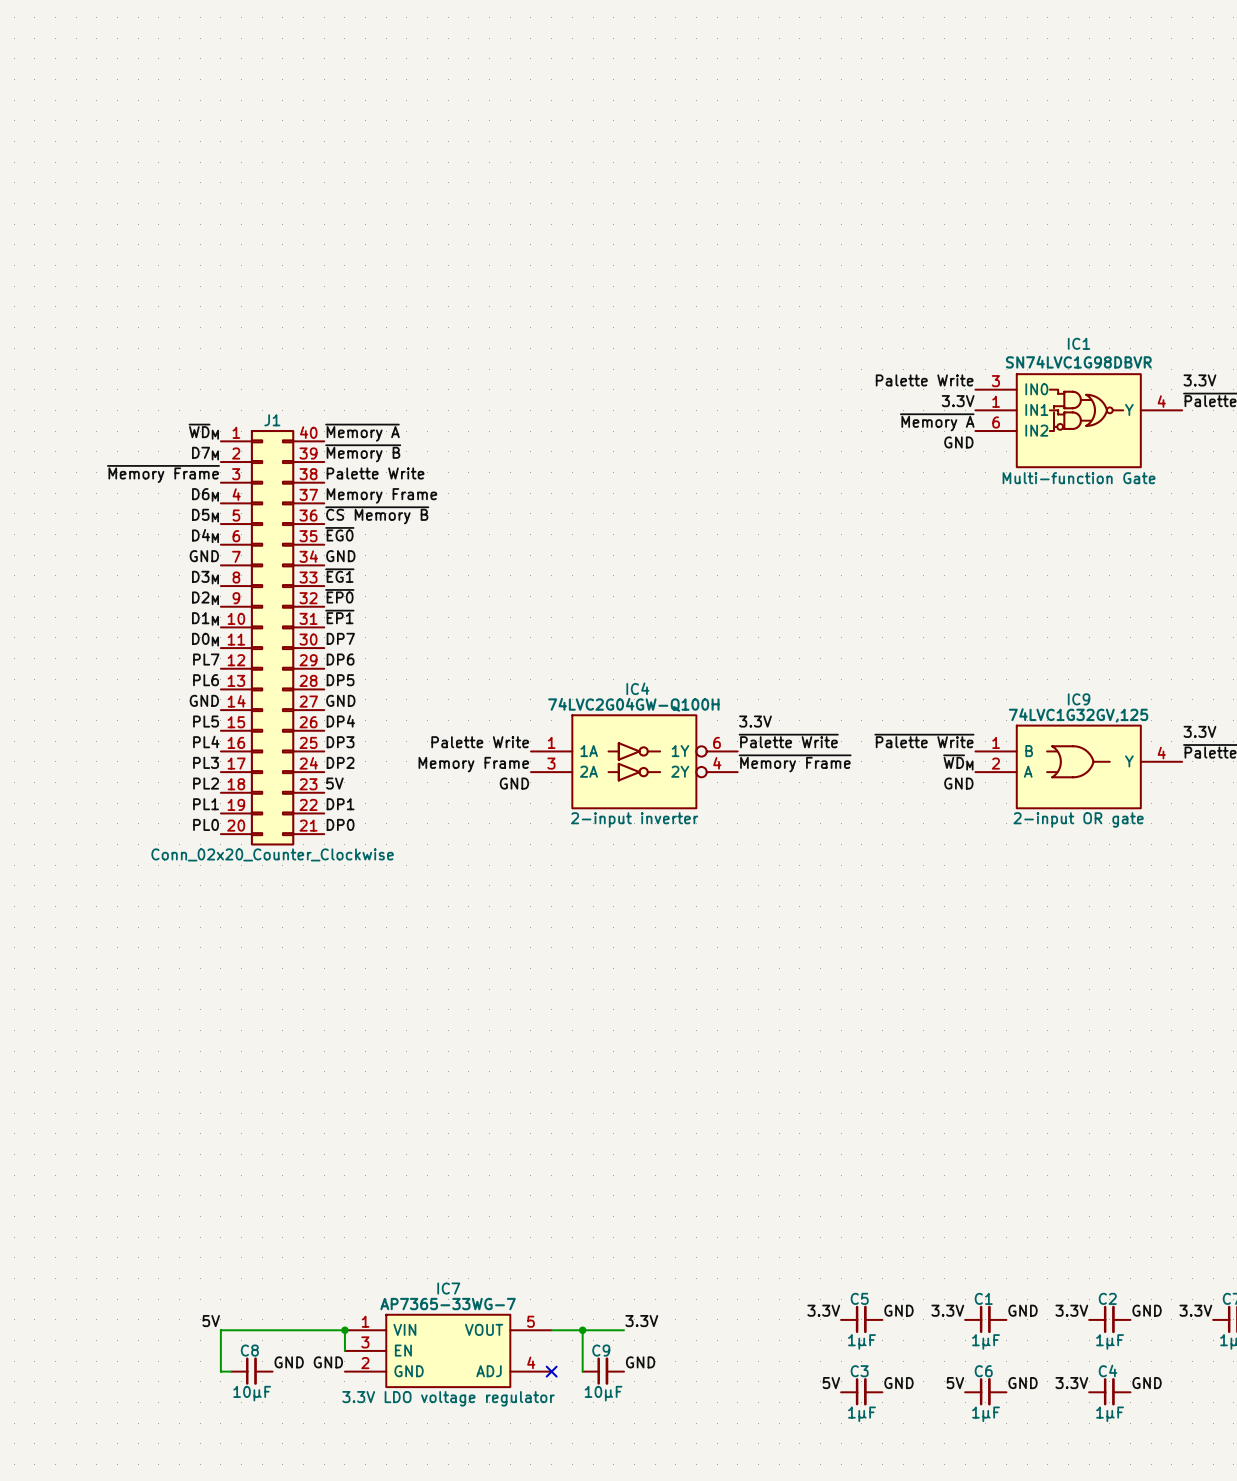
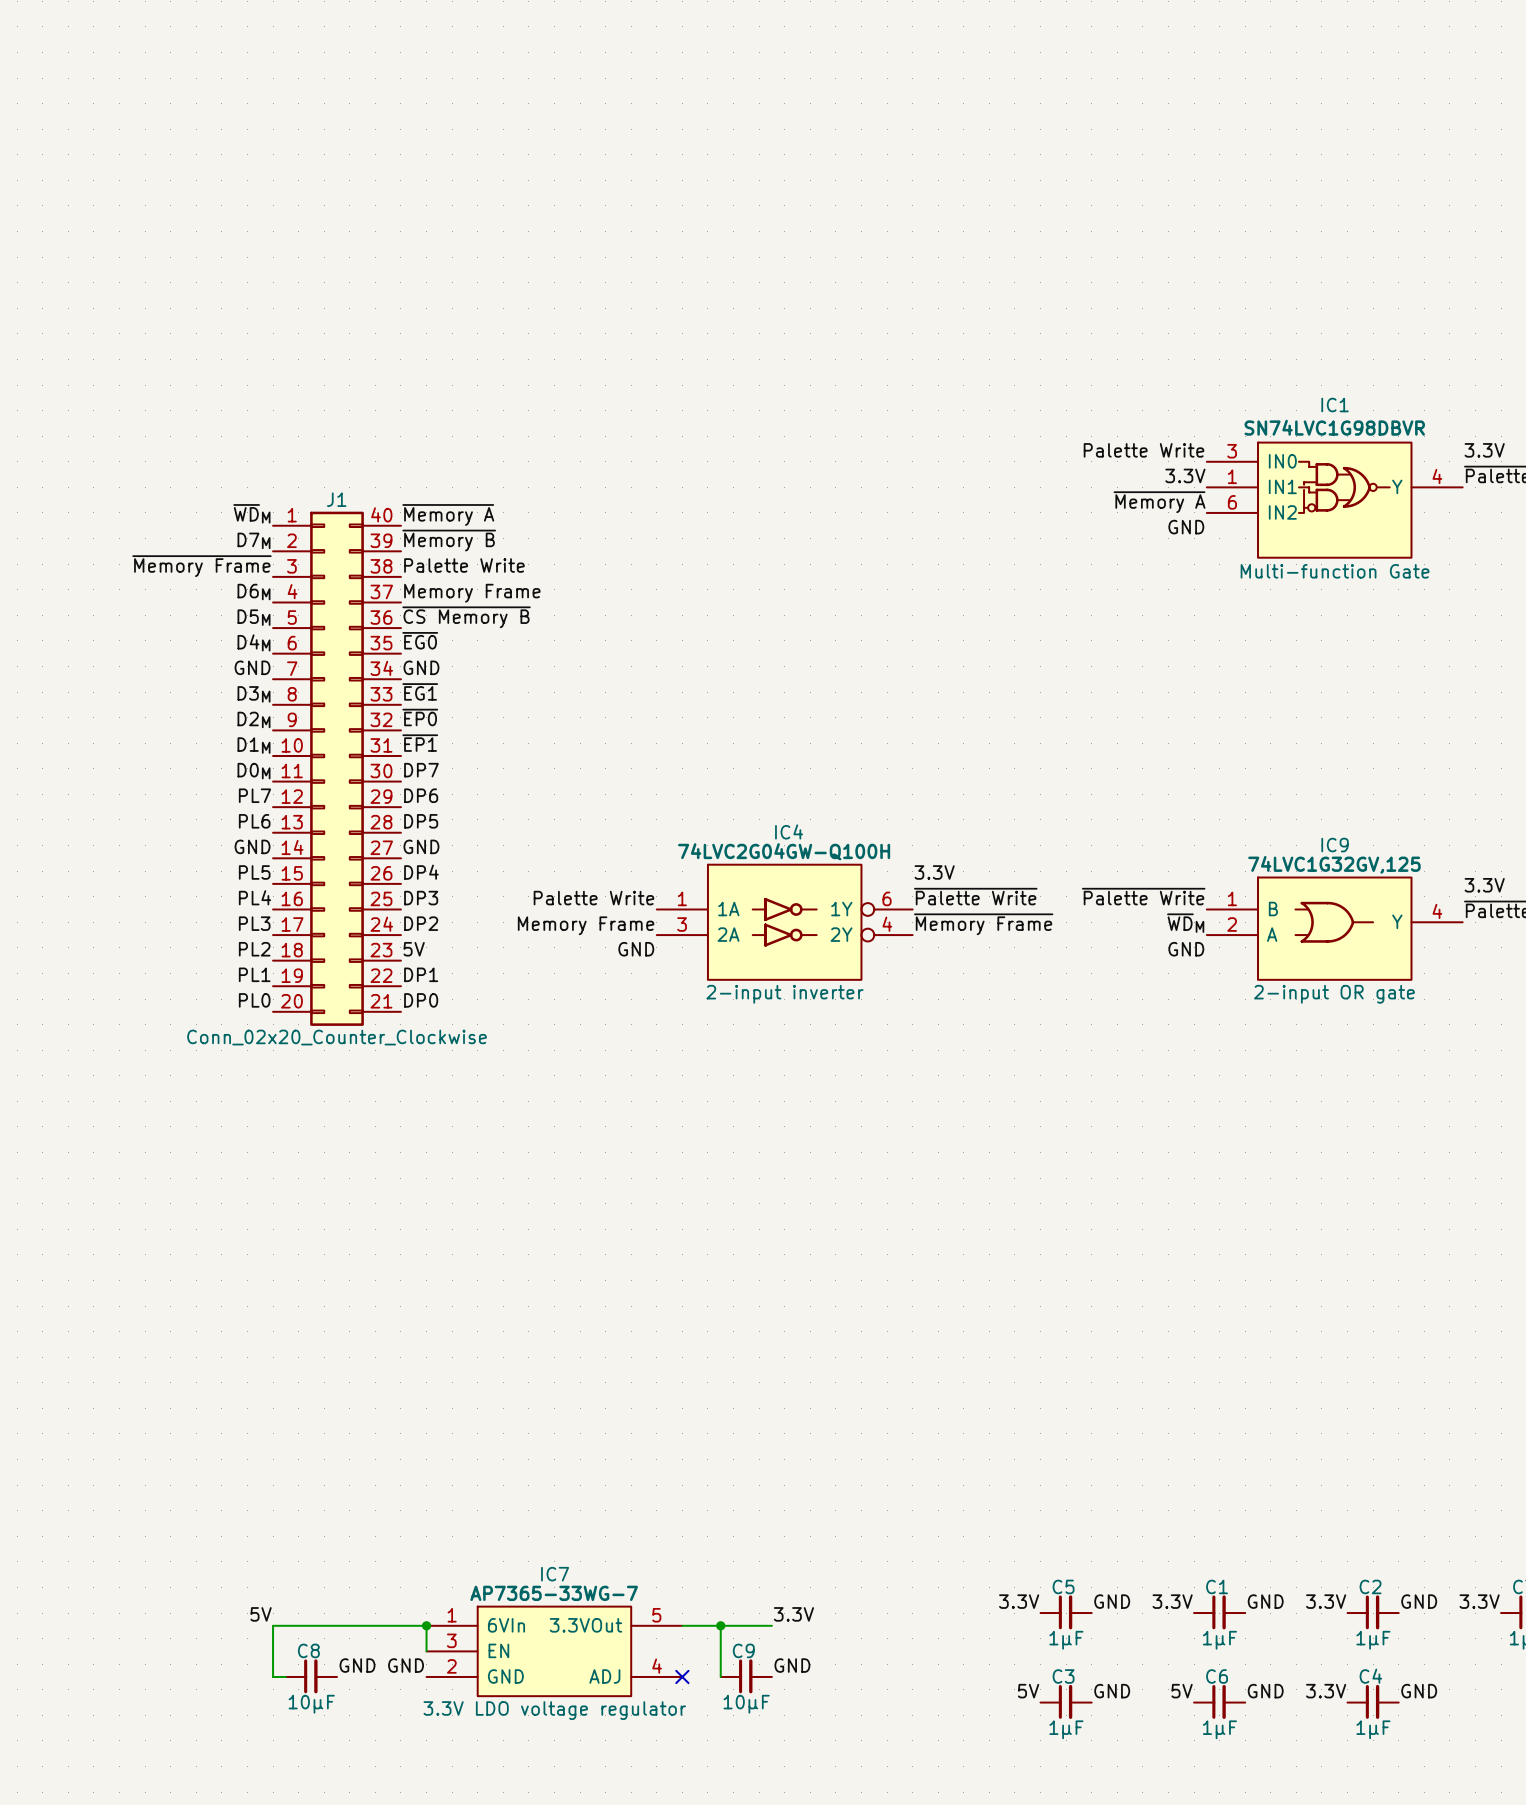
IC7 pin name: VIN (404, 1329) -> 6VIn (506, 1625)
IC7 pin name: VOUT (484, 1329) -> 3.3VOut (585, 1625)

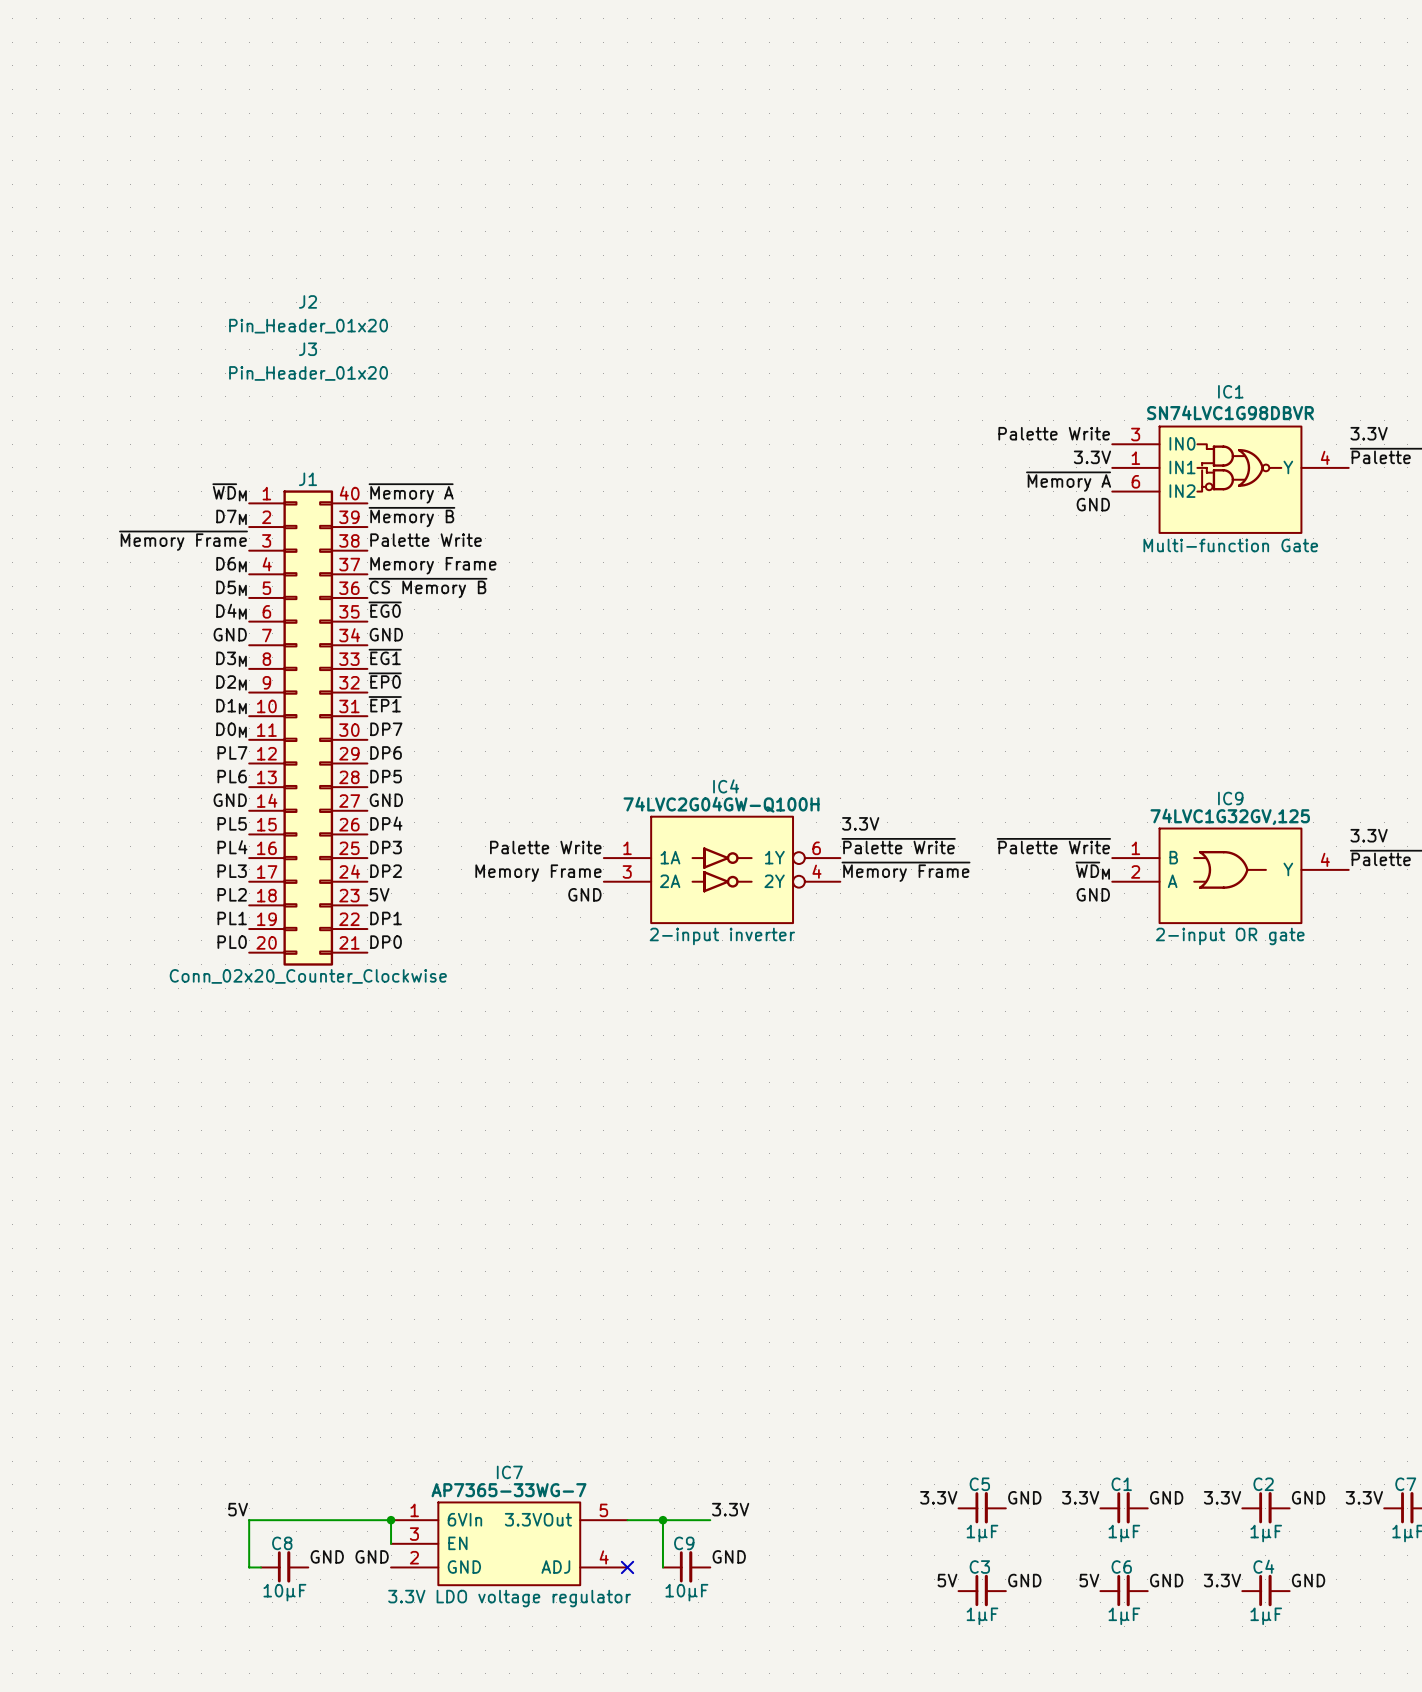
J2: none -> Pin_Header_01x20 (308, 314)
J3: none -> Pin_Header_01x20 (308, 361)

